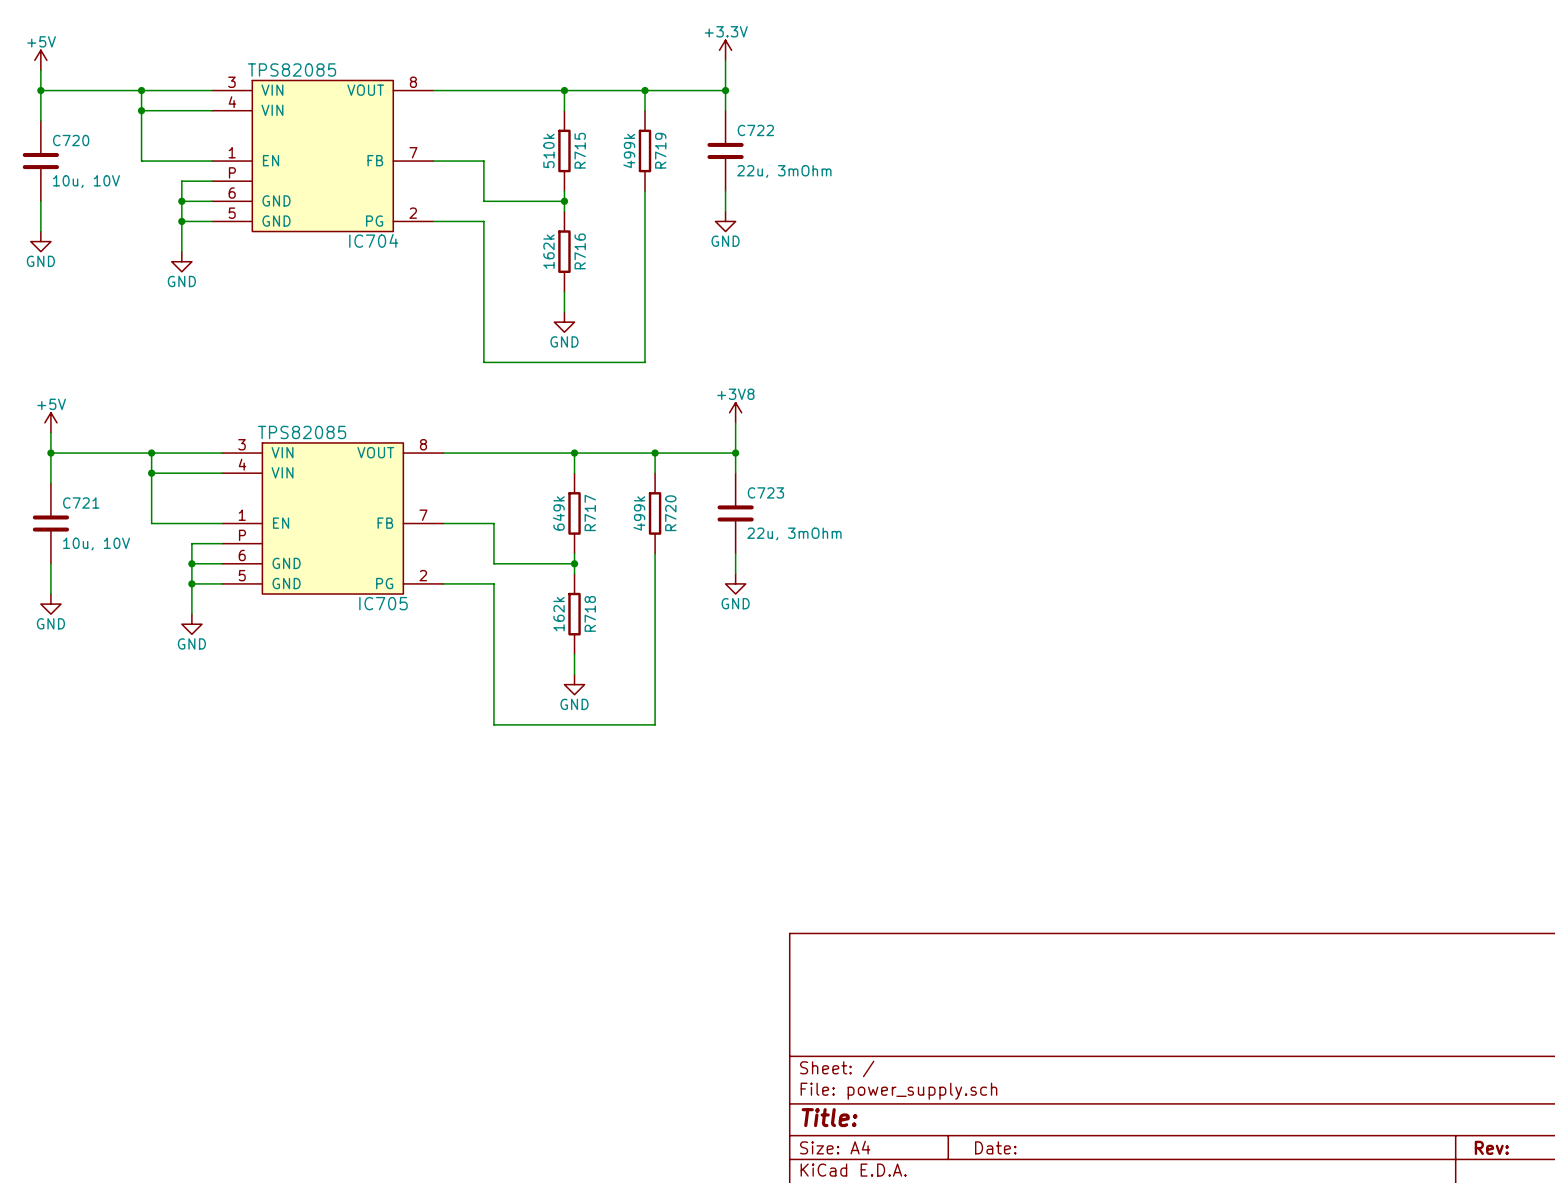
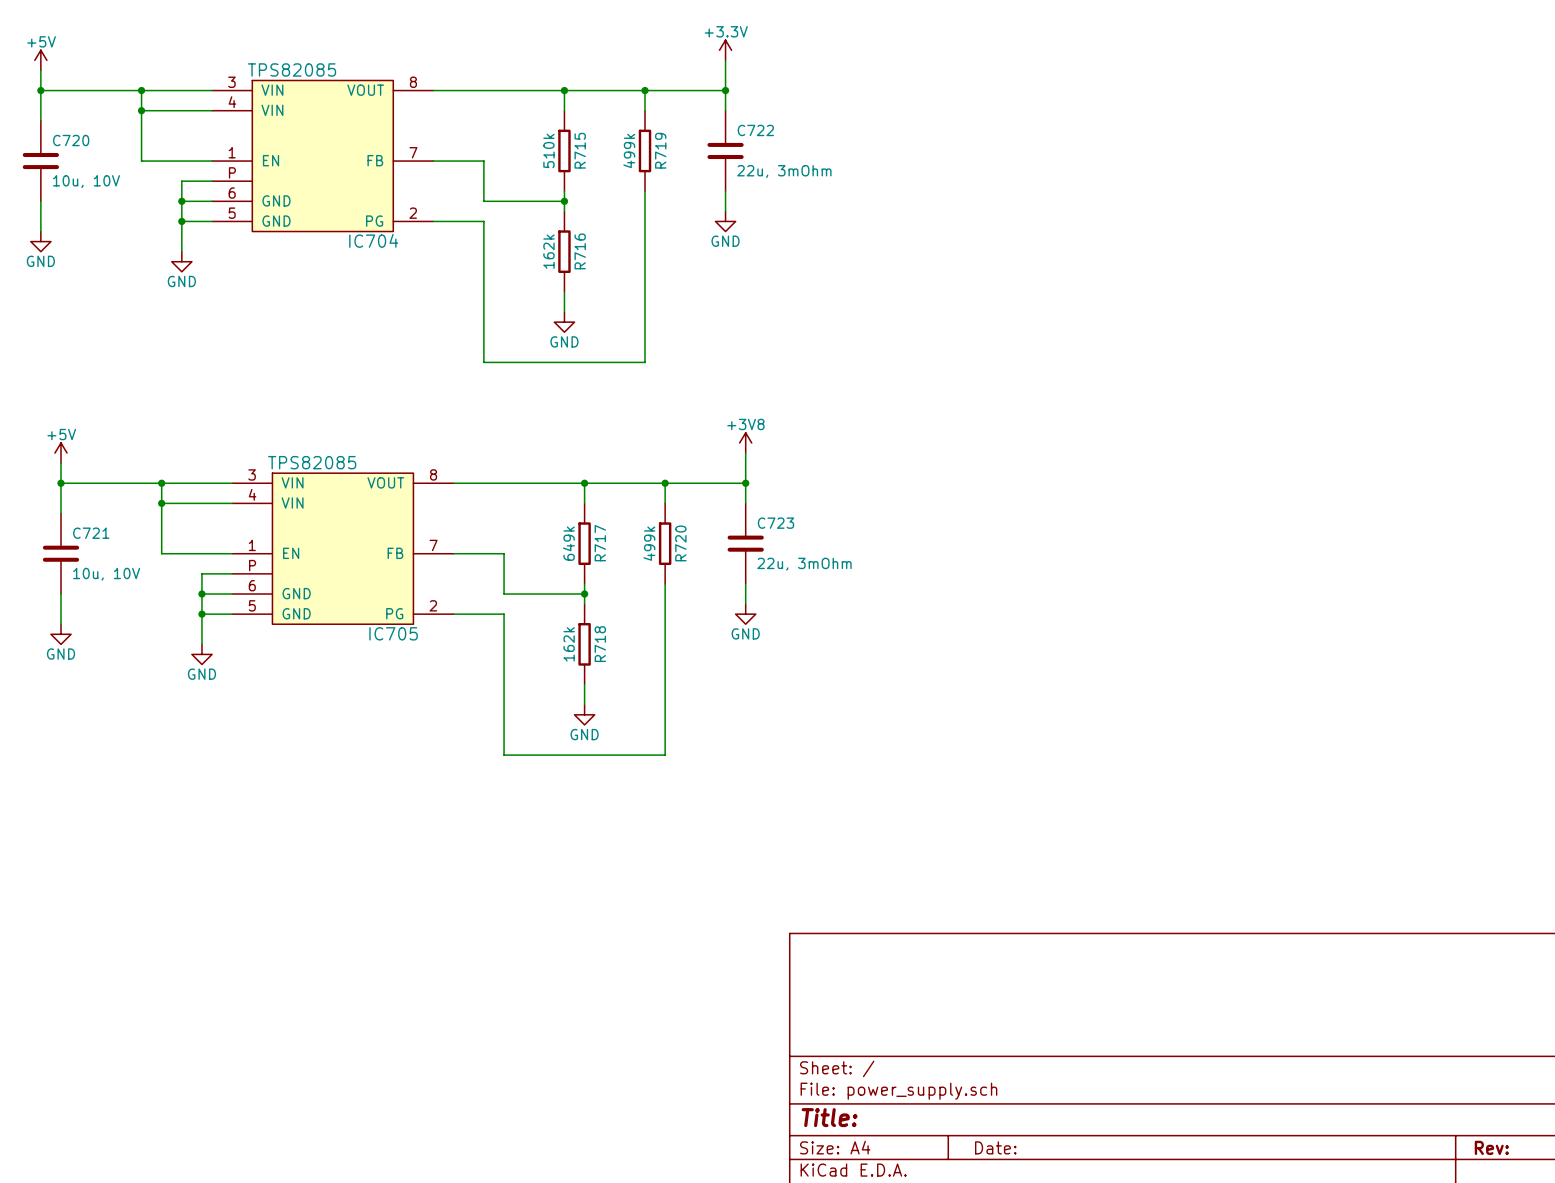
power symbol position: +3V8 (735, 412) -> +3V8 (745, 442)
power symbol position: +5V (50, 422) -> +5V (61, 453)
wire: (735, 422) (735, 473) -> (745, 453) (745, 503)
wire: (50, 432) (50, 483) -> (61, 463) (61, 513)
wire: (50, 453) (222, 453) -> (61, 483) (232, 483)
junction position: (50, 453) -> (61, 483)
wire: (151, 453) (151, 523) (222, 523) -> (161, 483) (161, 553) (232, 553)
junction: (151, 453) -> none
wire: (443, 453) (735, 453) -> (453, 483) (745, 483)
wire: (574, 453) (574, 473) -> (584, 483) (584, 503)
junction position: (574, 453) -> (584, 483)
wire: (655, 453) (655, 473) -> (665, 483) (665, 503)
junction position: (655, 453) -> (665, 483)
junction position: (735, 453) -> (745, 483)
wire: (151, 473) (222, 473) -> (161, 503) (232, 503)
junction position: (151, 473) -> (161, 483)
junction: none -> (161, 503)
R717 position: (574, 513) -> (584, 543)
R720 position: (655, 513) -> (665, 543)
C723 position: (735, 513) -> (745, 543)
IC705 position: (332, 518) -> (342, 548)
C721 position: (50, 523) -> (61, 553)
wire: (443, 523) (493, 523) (493, 563) (574, 563) -> (453, 553) (504, 553) (504, 594) (584, 594)
wire: (222, 543) (191, 543) (191, 614) -> (232, 573) (201, 573) (201, 644)
wire: (574, 553) (574, 573) -> (584, 583) (584, 604)
wire: (655, 553) (655, 724) (493, 724) (493, 583) (443, 583) -> (665, 583) (665, 755) (504, 755) (504, 614) (453, 614)
wire: (735, 553) (735, 573) -> (745, 583) (745, 604)
wire: (50, 563) (50, 594) -> (61, 594) (61, 624)
wire: (191, 563) (222, 563) -> (201, 594) (232, 594)
junction: (191, 563) -> none
junction position: (574, 563) -> (584, 594)
wire: (191, 583) (222, 583) -> (201, 614) (232, 614)
junction position: (191, 583) -> (201, 594)
power symbol position: GND (735, 583) -> GND (745, 614)
power symbol position: GND (50, 604) -> GND (61, 634)
junction: none -> (201, 614)
R718 position: (574, 614) -> (584, 644)
power symbol position: GND (191, 624) -> GND (201, 654)
wire: (574, 654) (574, 674) -> (584, 684) (584, 704)
power symbol position: GND (574, 684) -> GND (584, 714)

